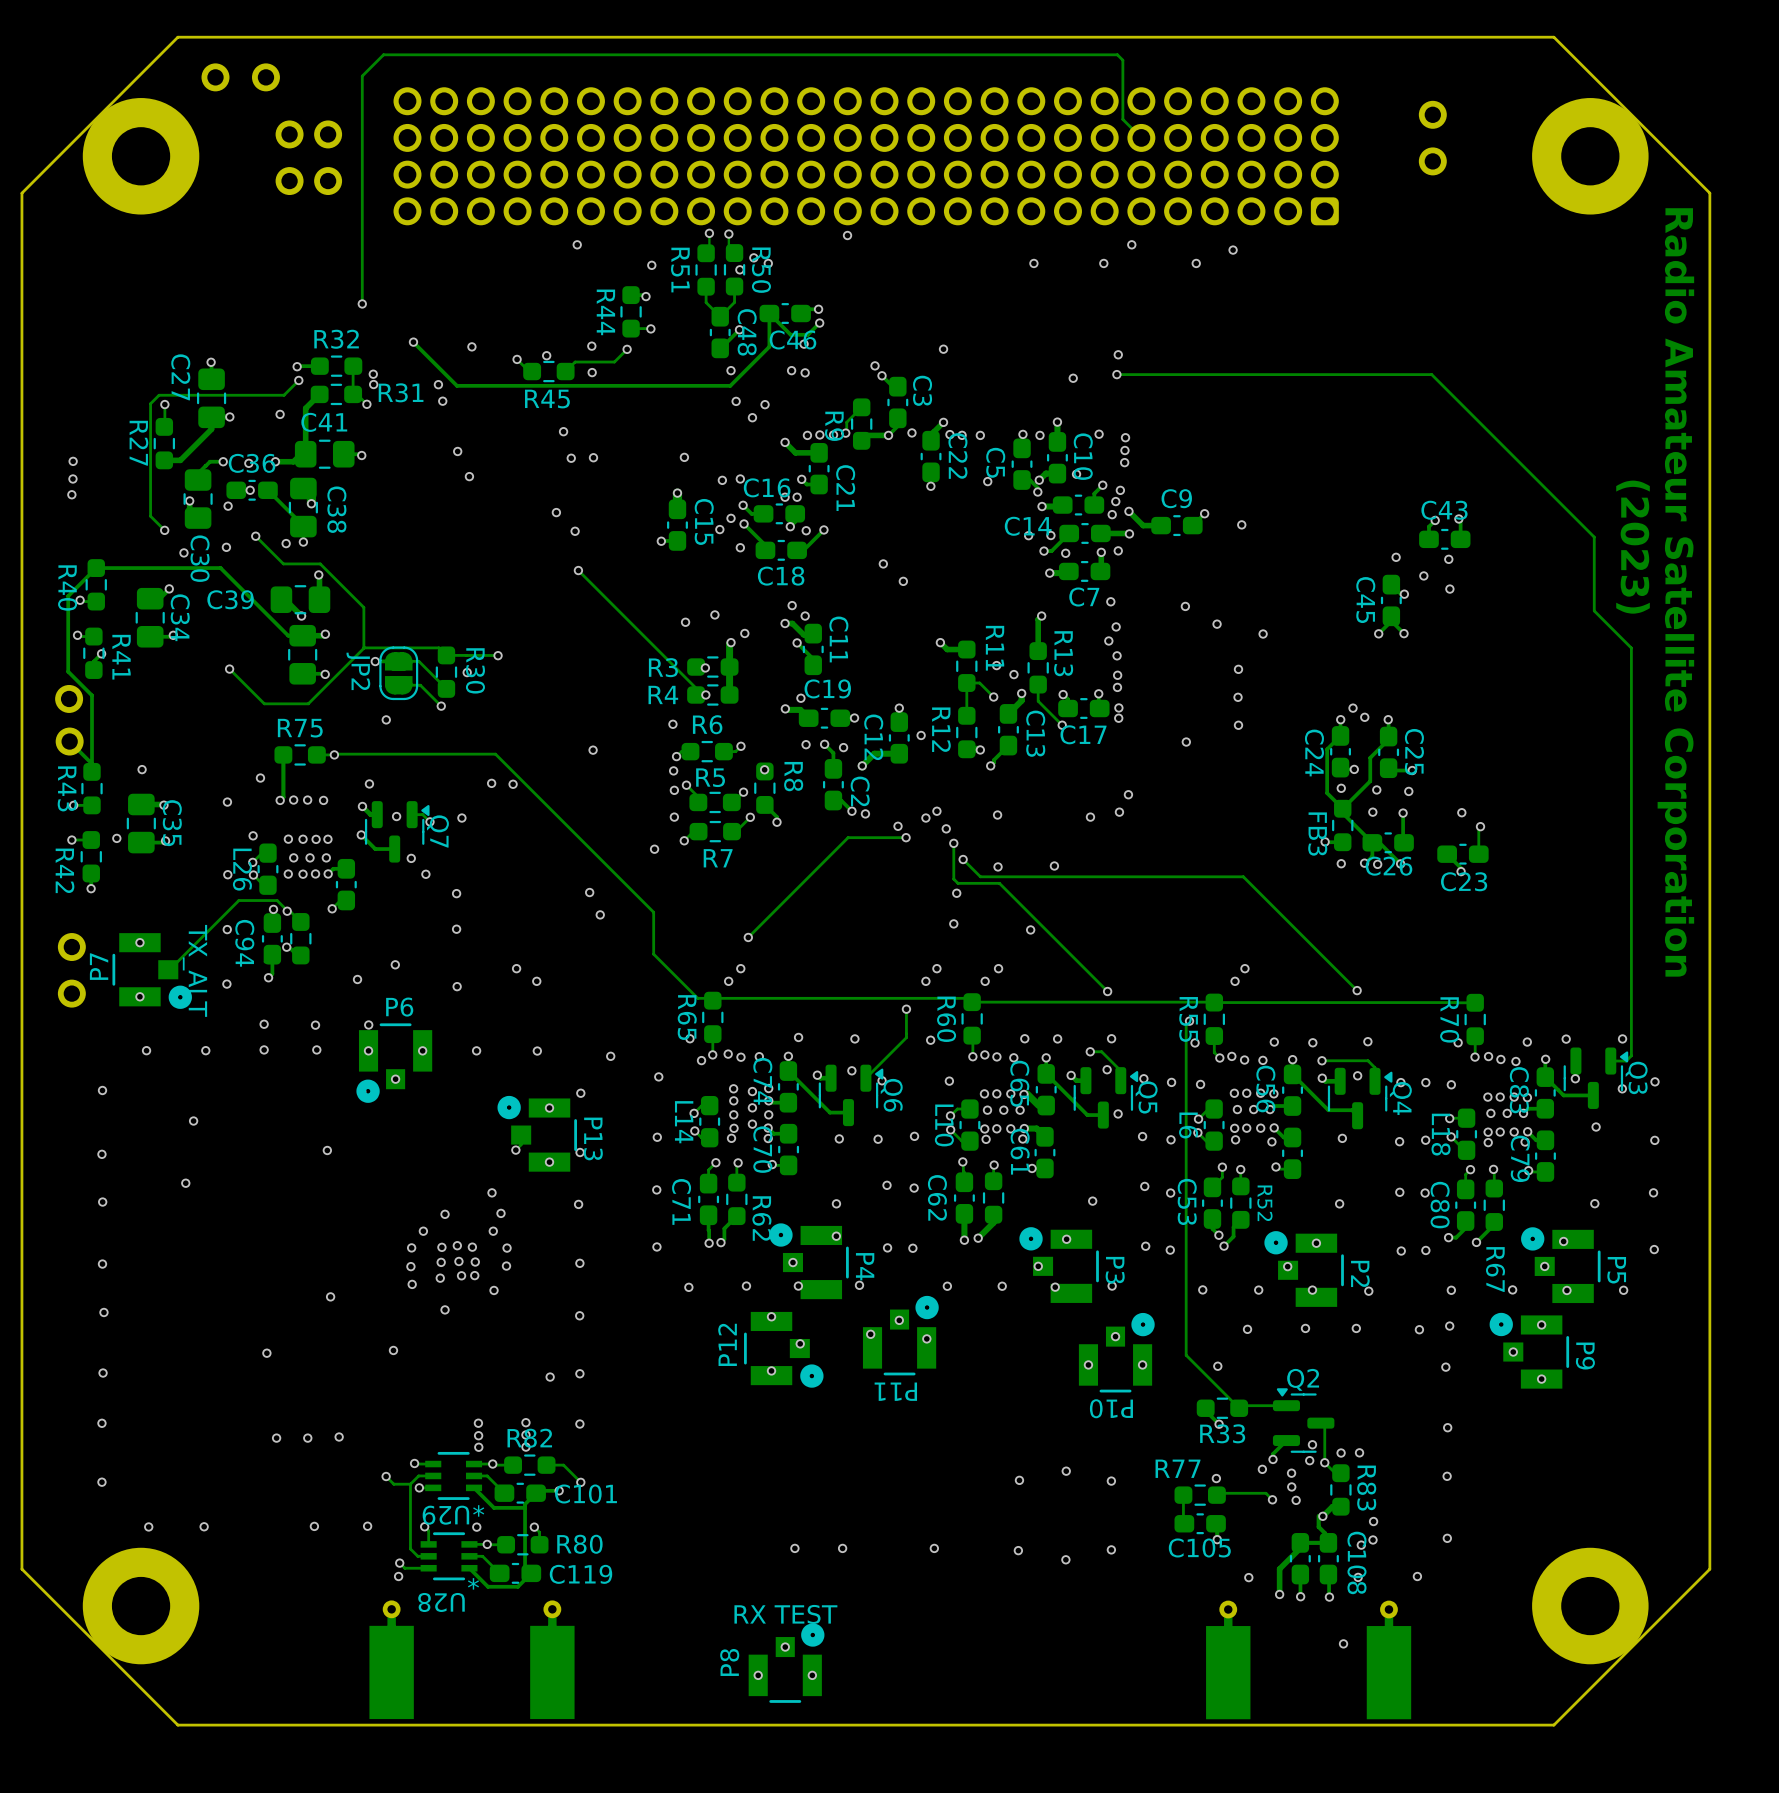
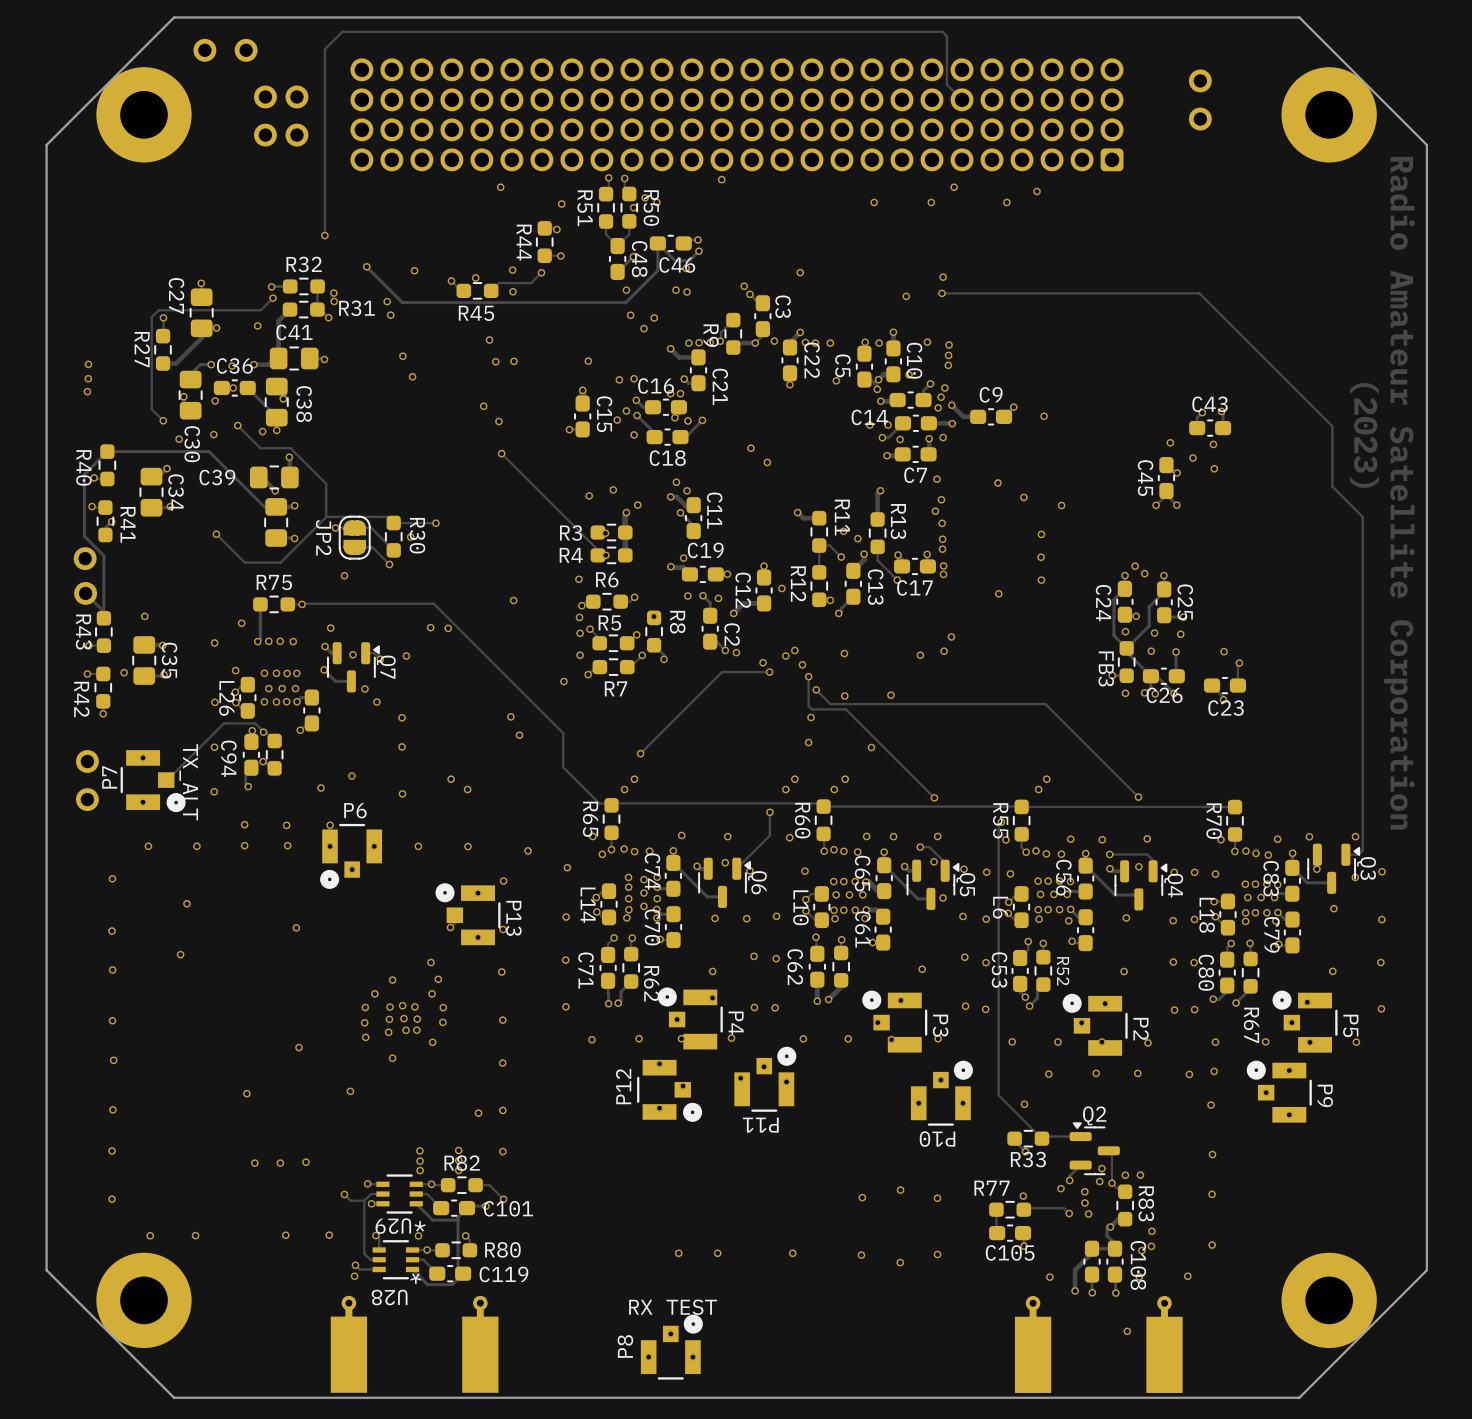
track: (272, 954) (272, 973) (268, 977) -> none
track: none -> (245, 773) (245, 783)

